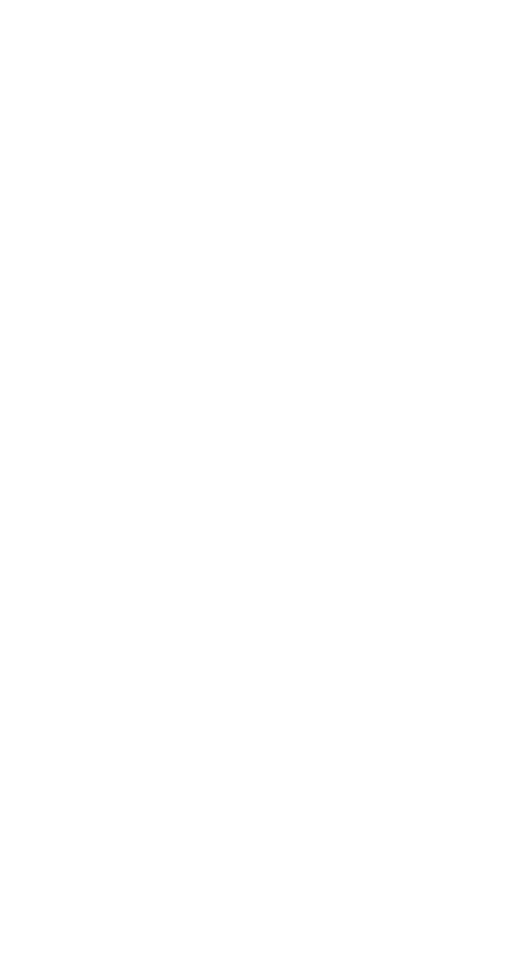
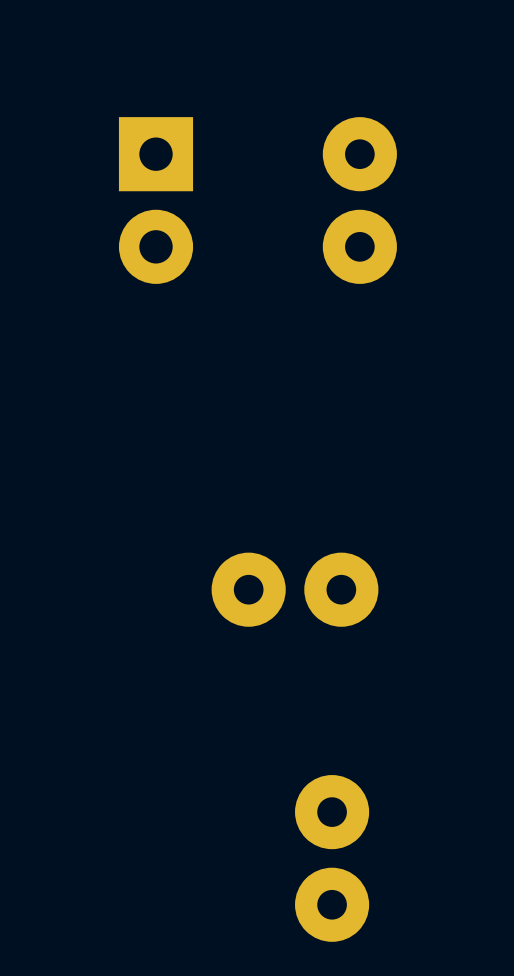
part: none -> (156, 200)
part: none -> (359, 200)
part: none -> (295, 589)
part: none -> (332, 858)

